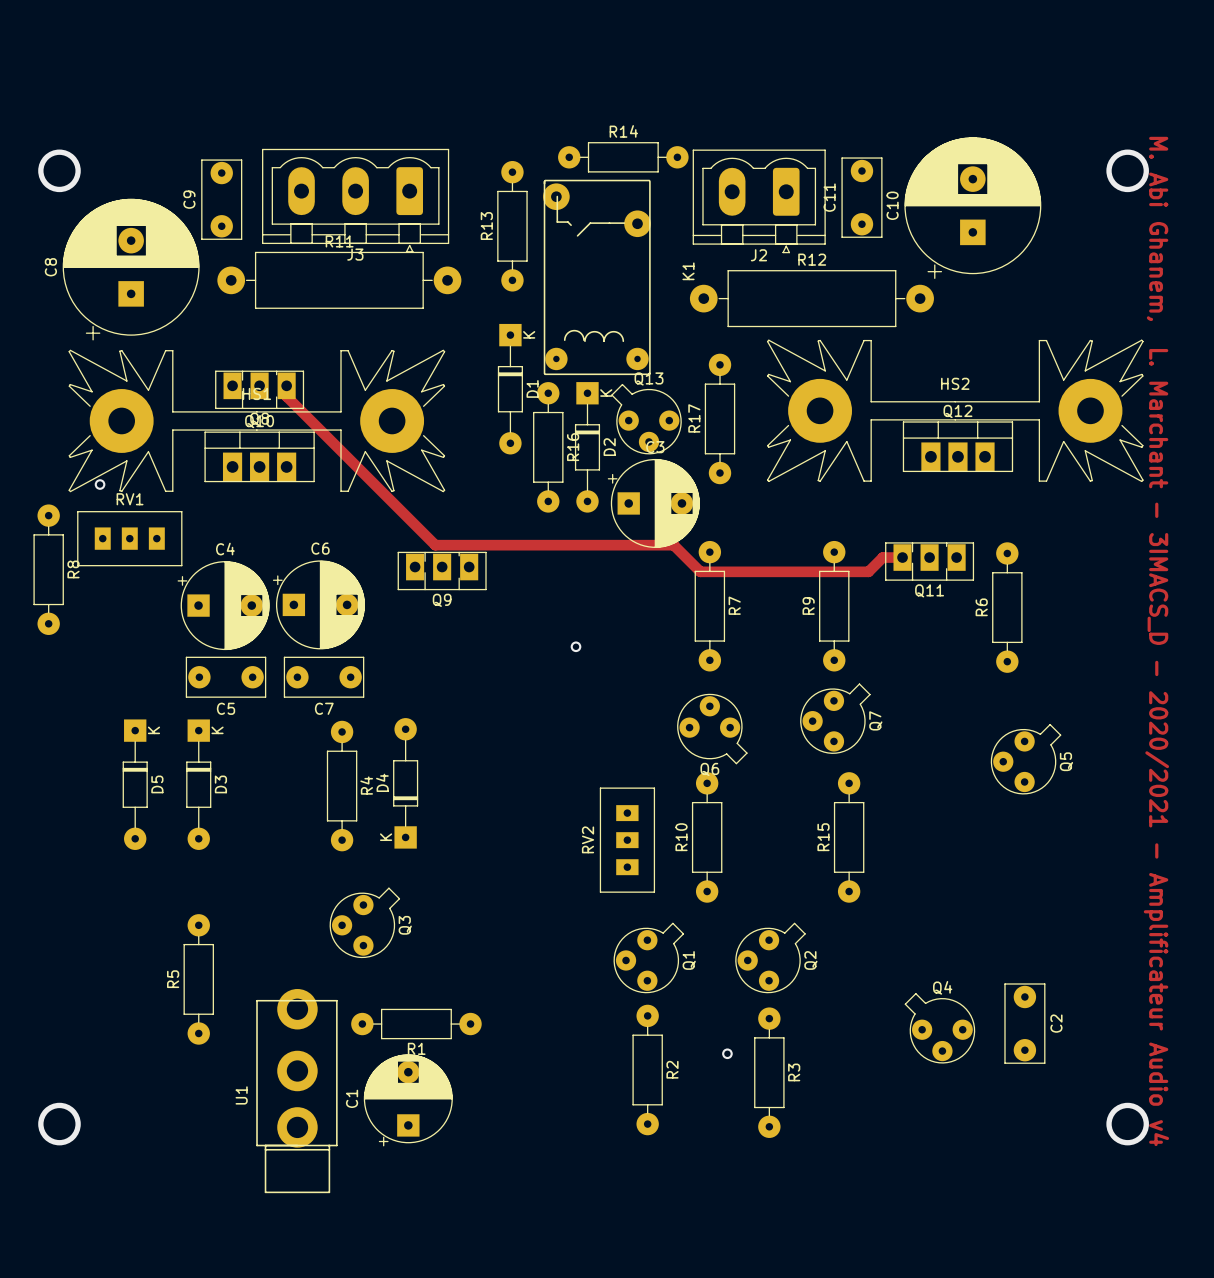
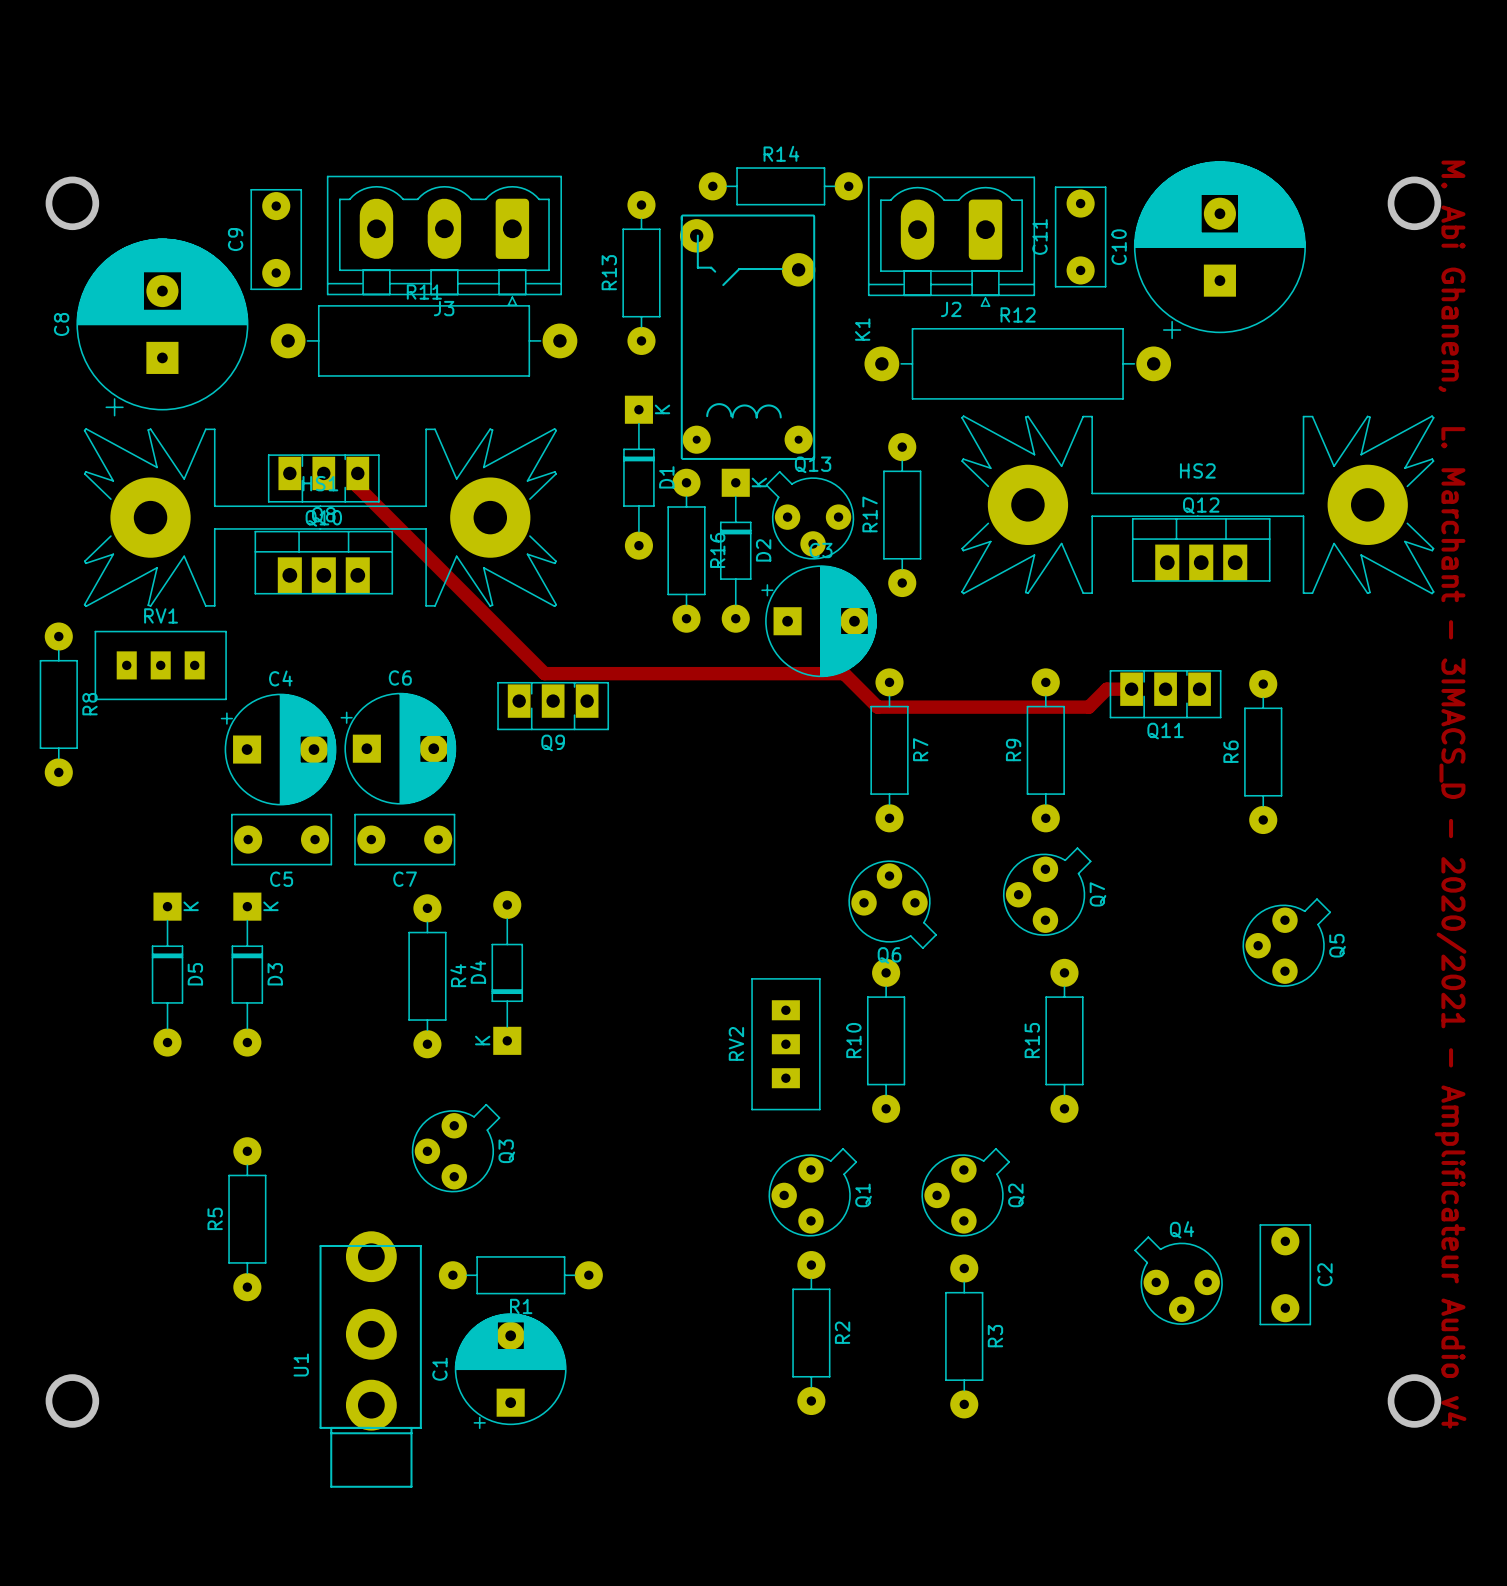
via: (100, 484) -> none
via: (575, 646) -> none
via: (727, 1053) -> none

